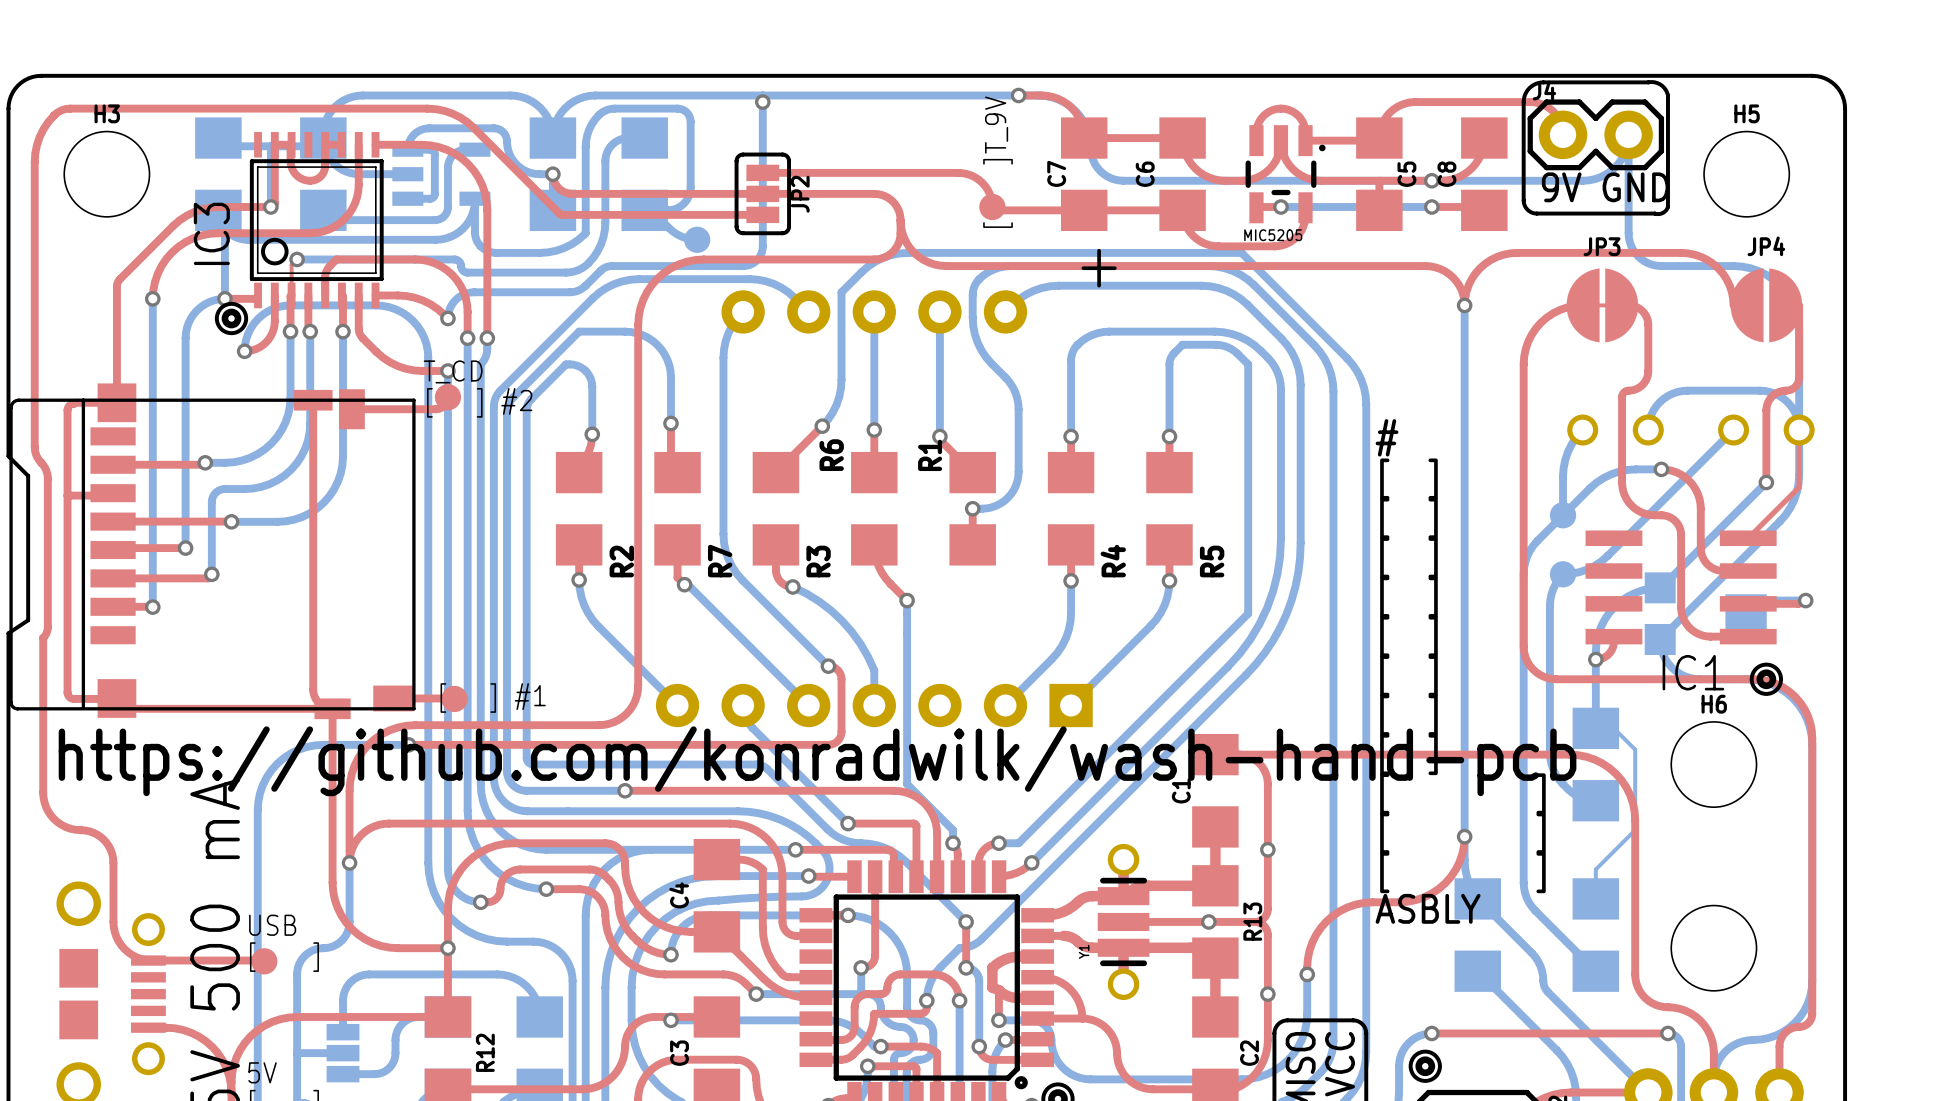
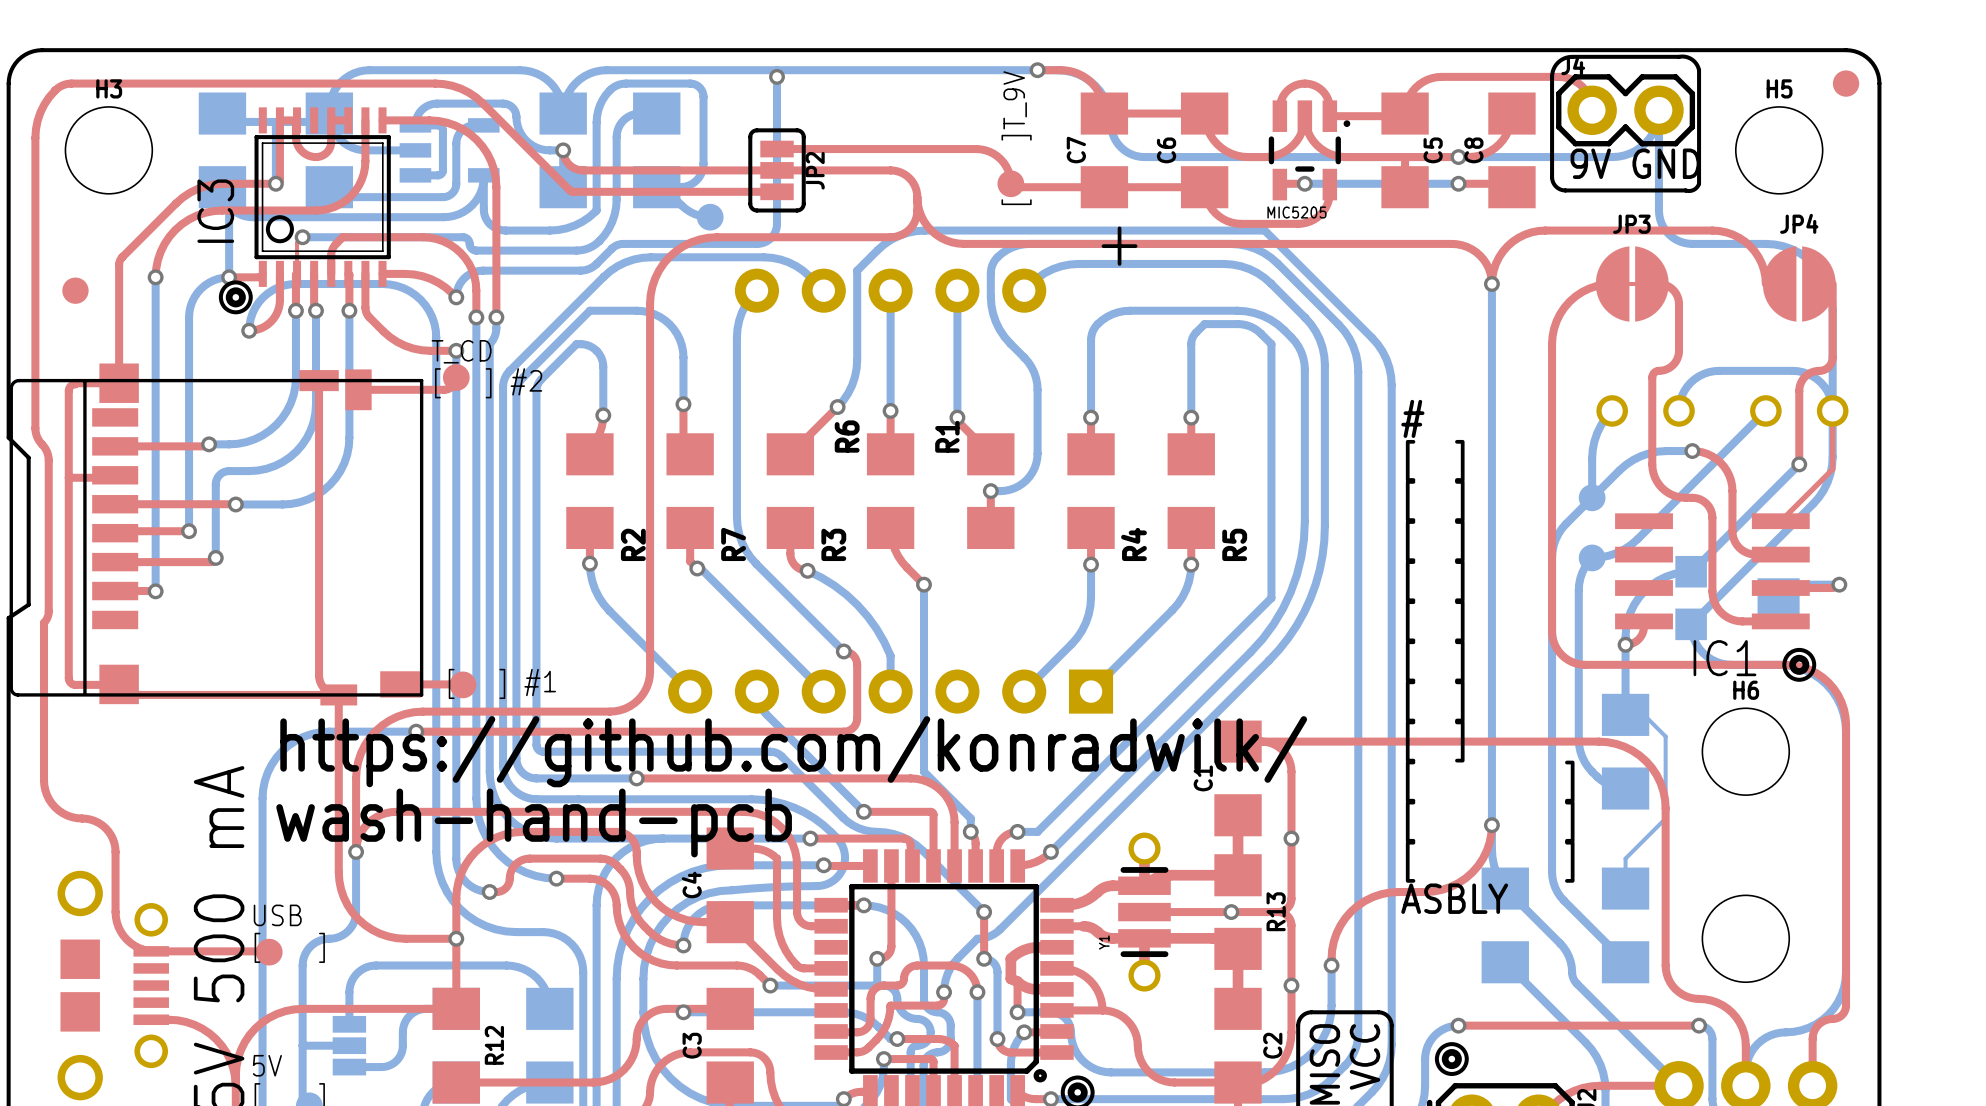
part: none -> (1846, 83)
part: none -> (75, 290)
text: https://github.com/konradwilk/wash-hand-pcb (817, 761) -> https://github.com/konradwilk/ (793, 751)
text: none -> wash-hand-pcb (534, 822)

